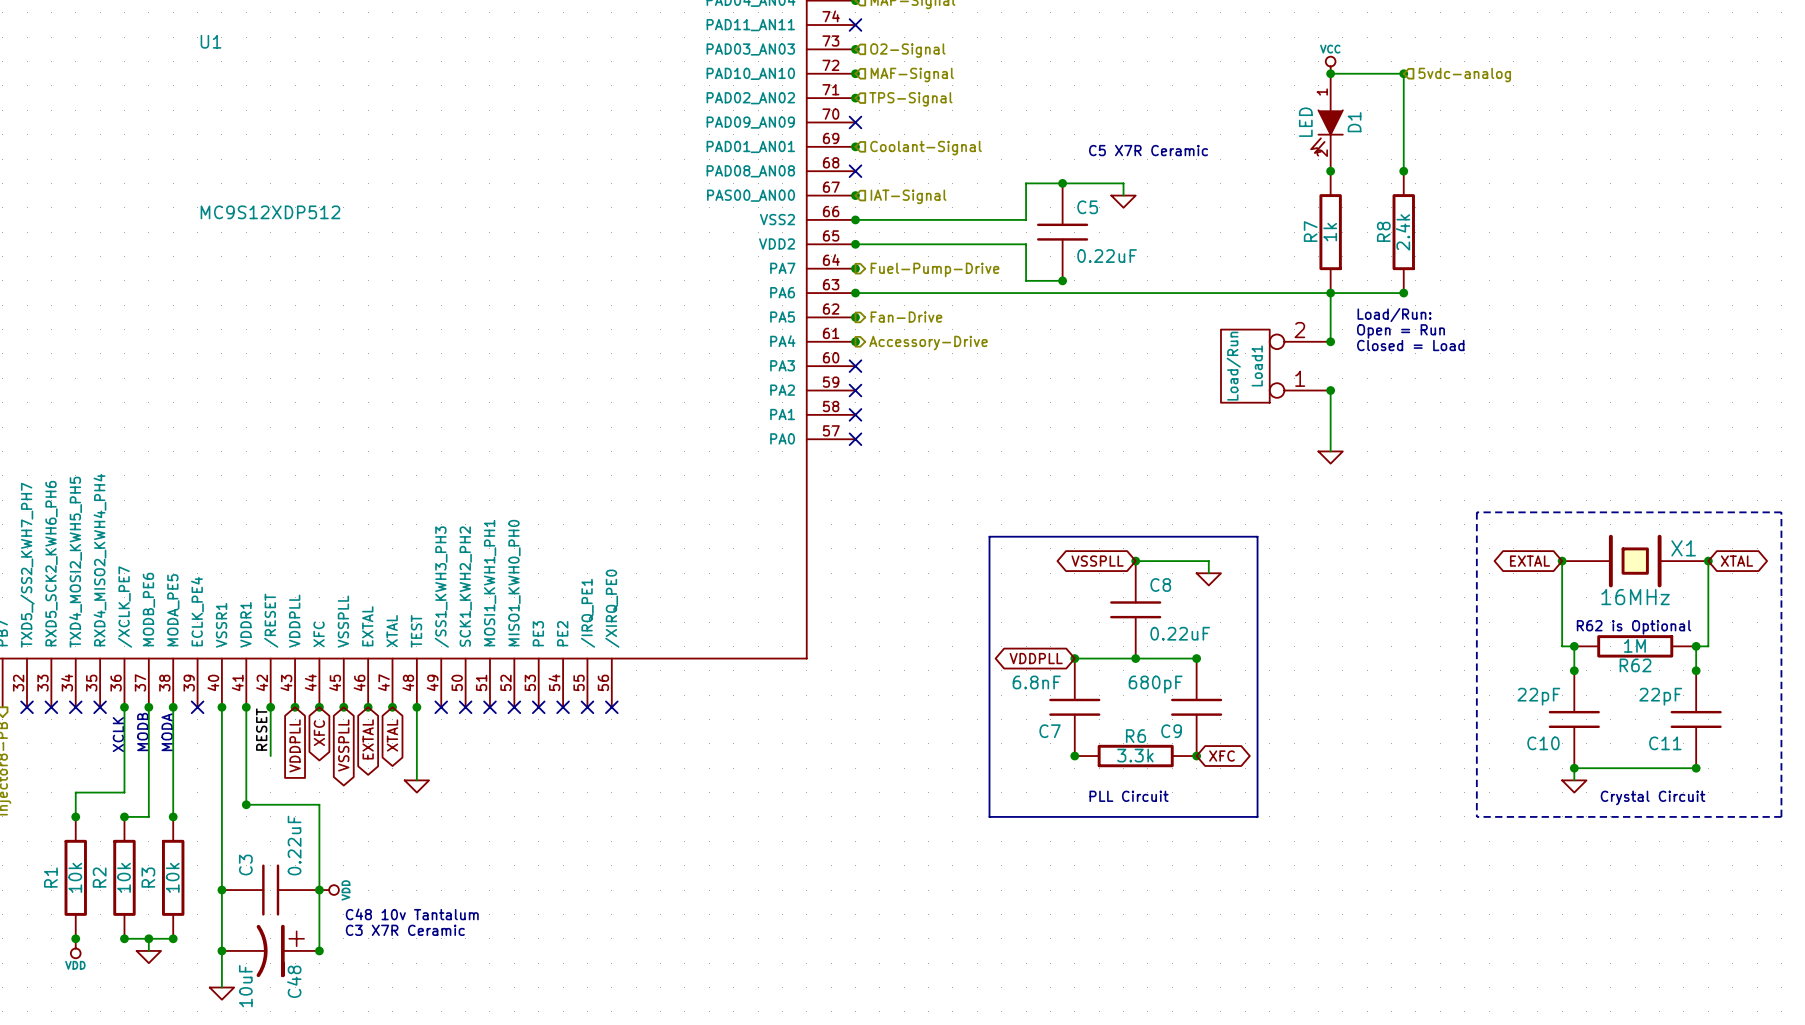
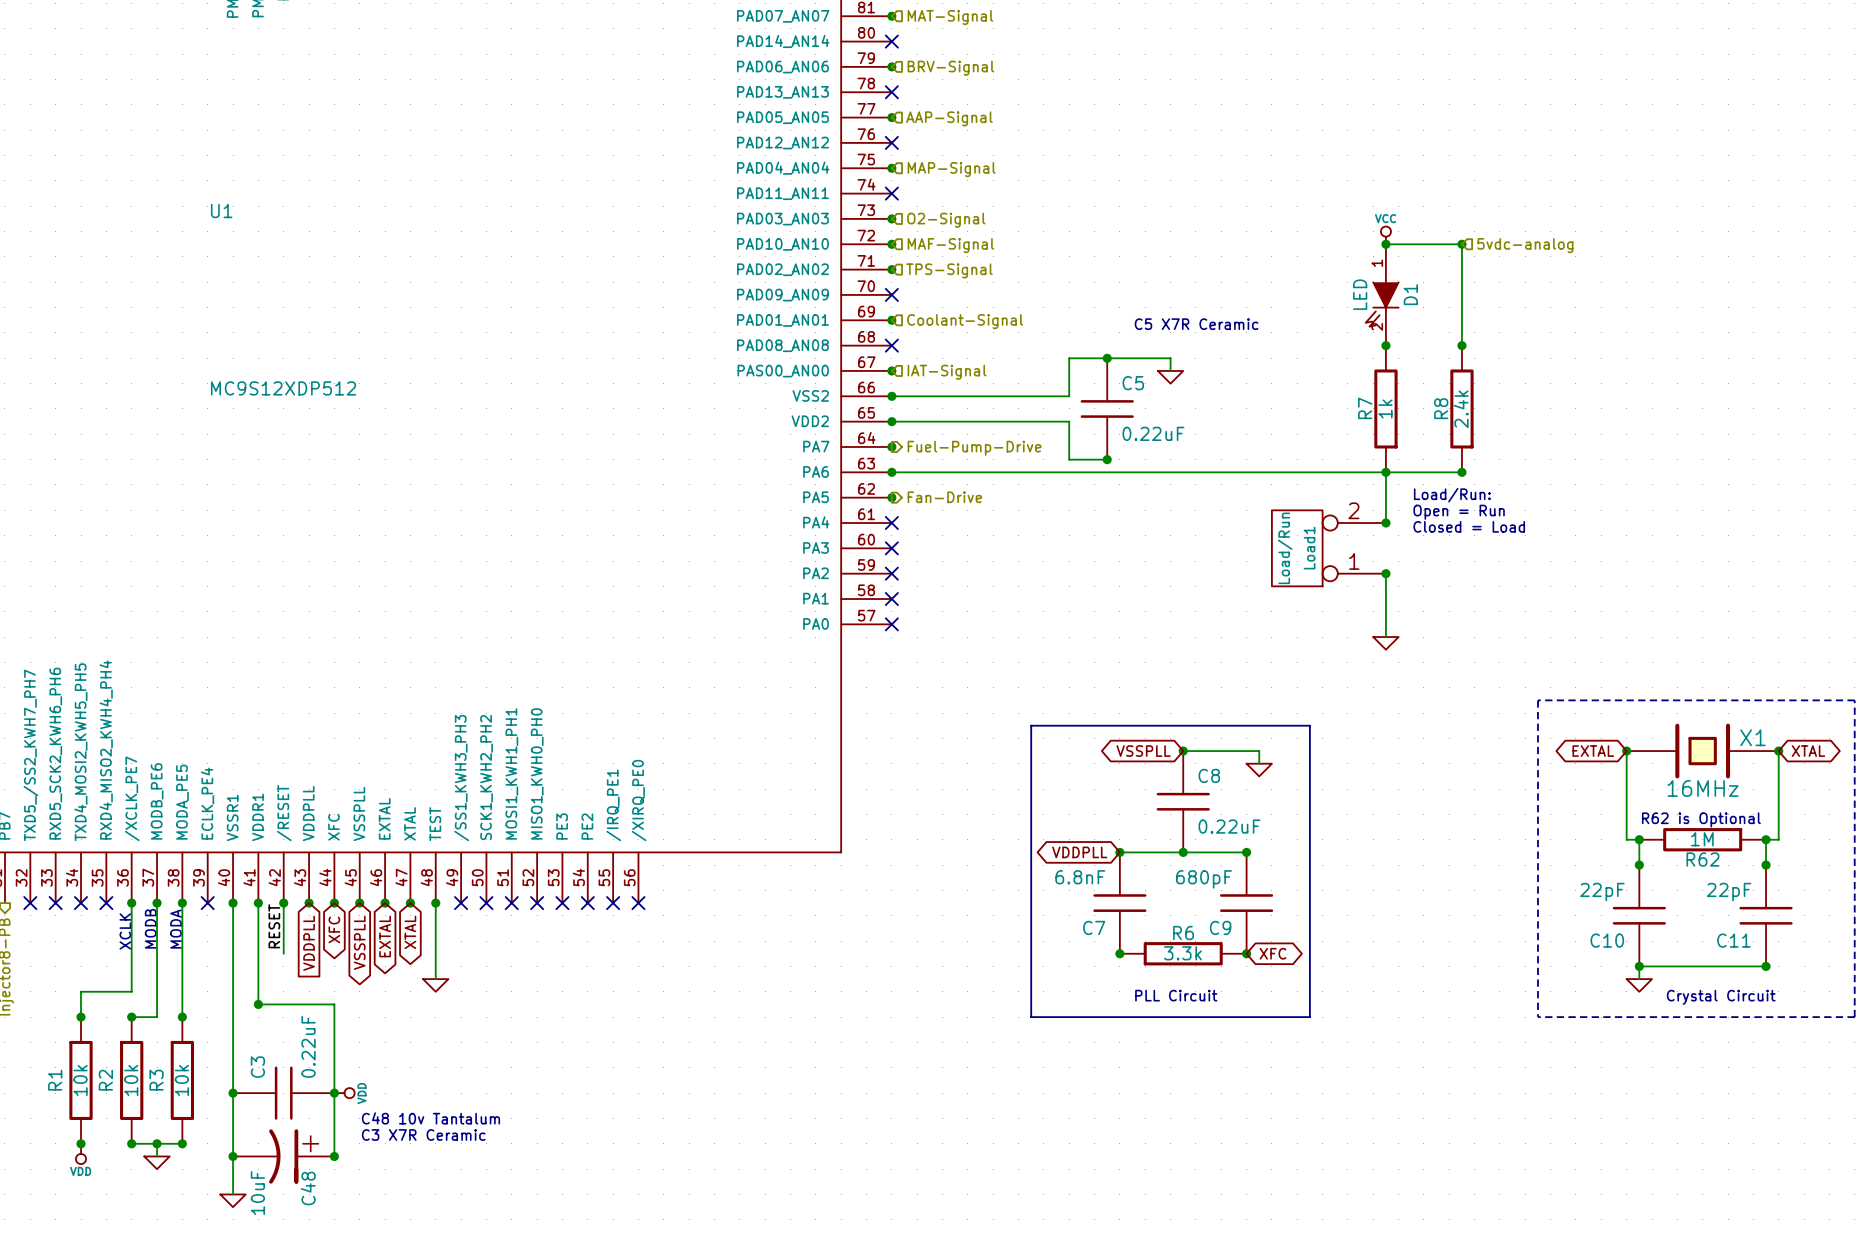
junction: (855, 341) -> none
no-connect mark: none -> (891, 523)
hierarchical label: Accessory-Drive (928, 343) -> none

